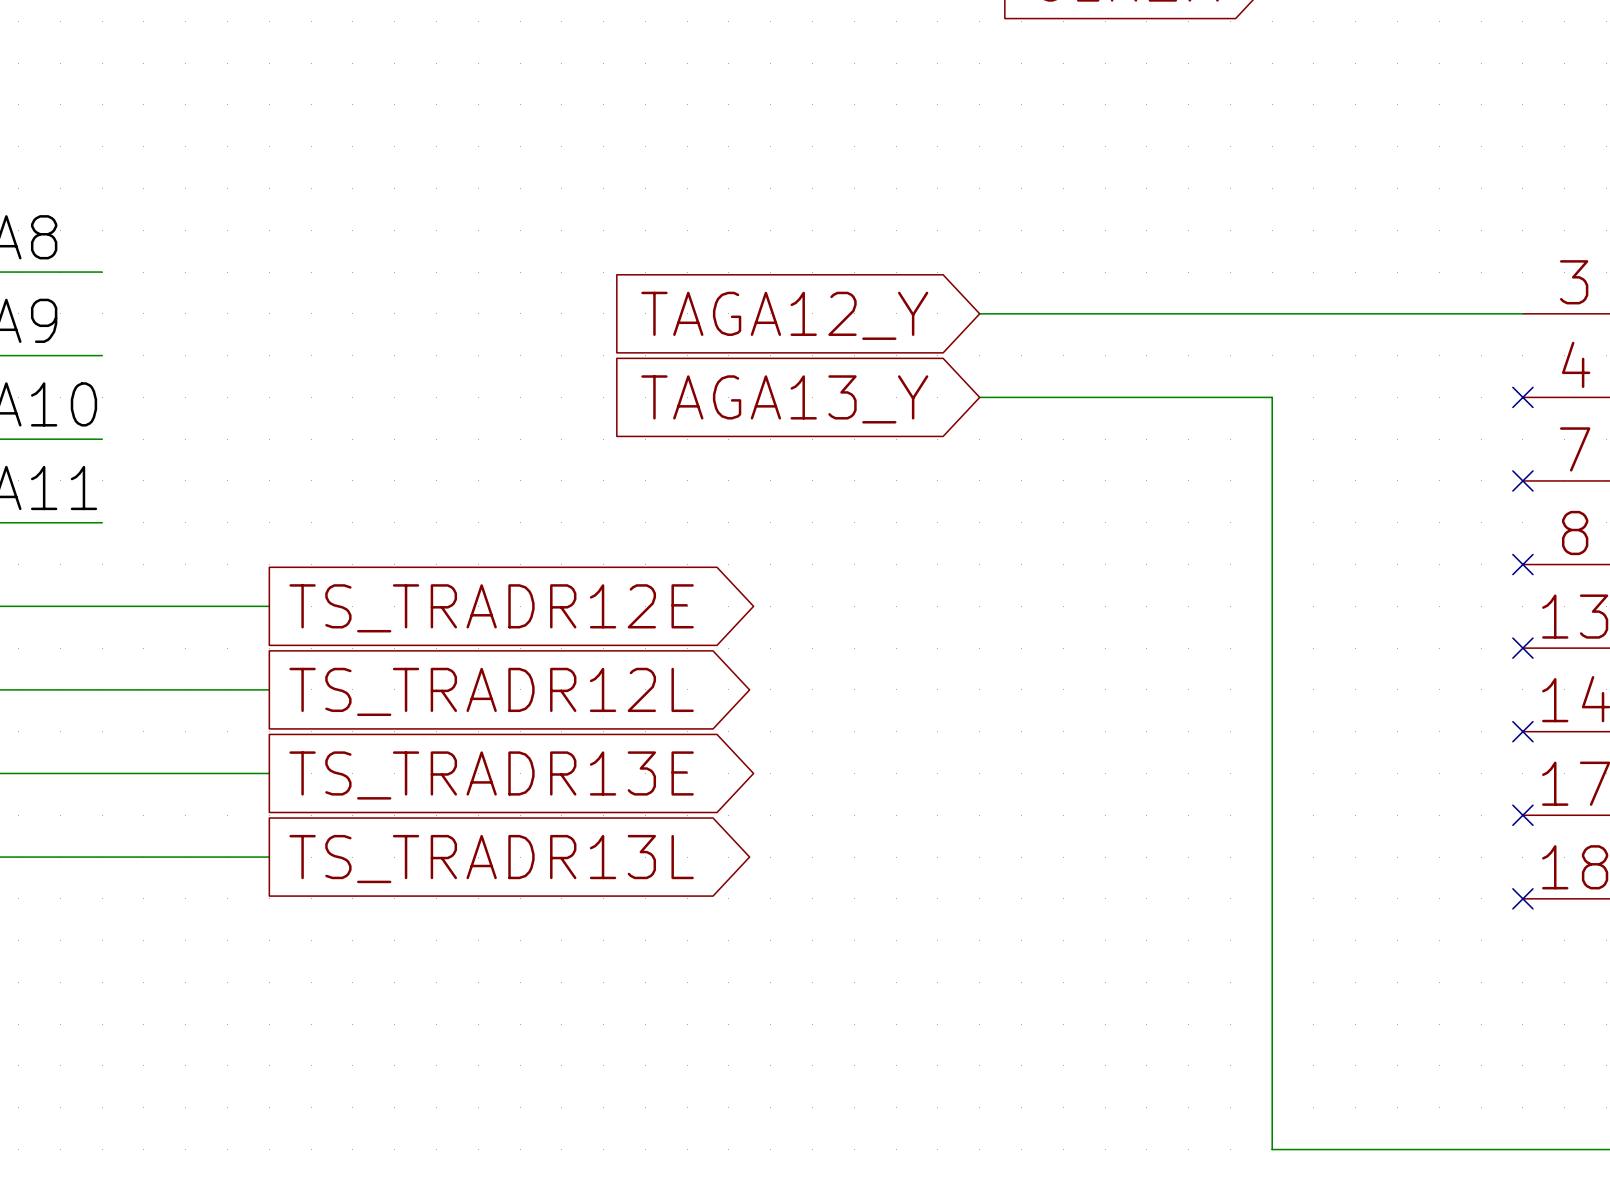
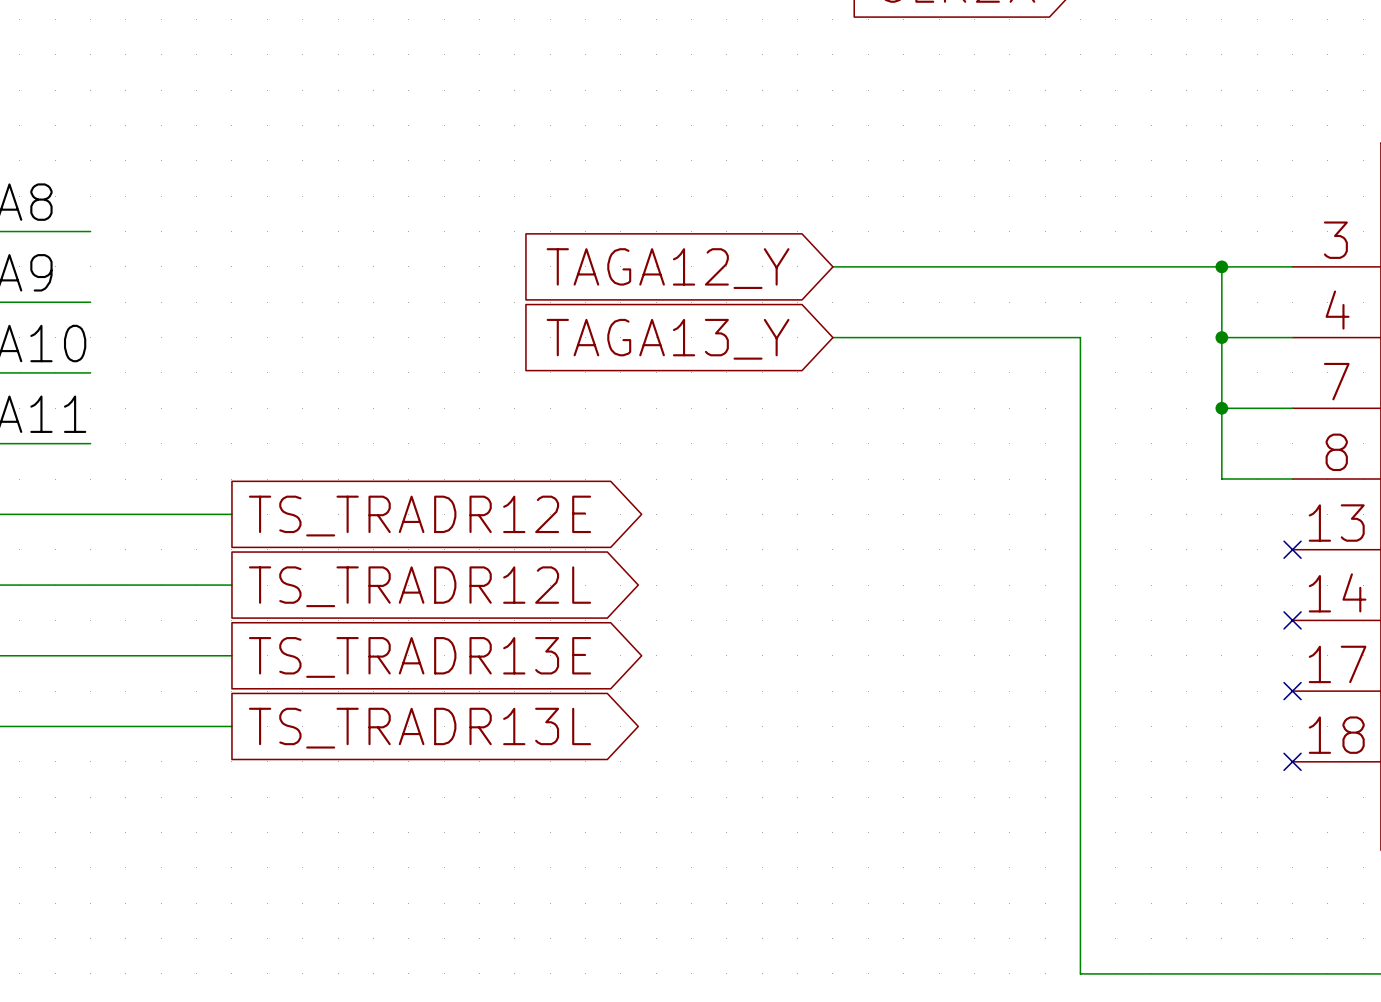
wire: none -> (1221, 266) (1221, 479) (1292, 479)
junction: none -> (1221, 266)
wire: none -> (1221, 337) (1292, 337)
junction: none -> (1221, 337)
no-connect mark: (1522, 397) -> none
wire: none -> (1221, 408) (1292, 408)
junction: none -> (1221, 408)
no-connect mark: (1522, 480) -> none
no-connect mark: (1522, 564) -> none

